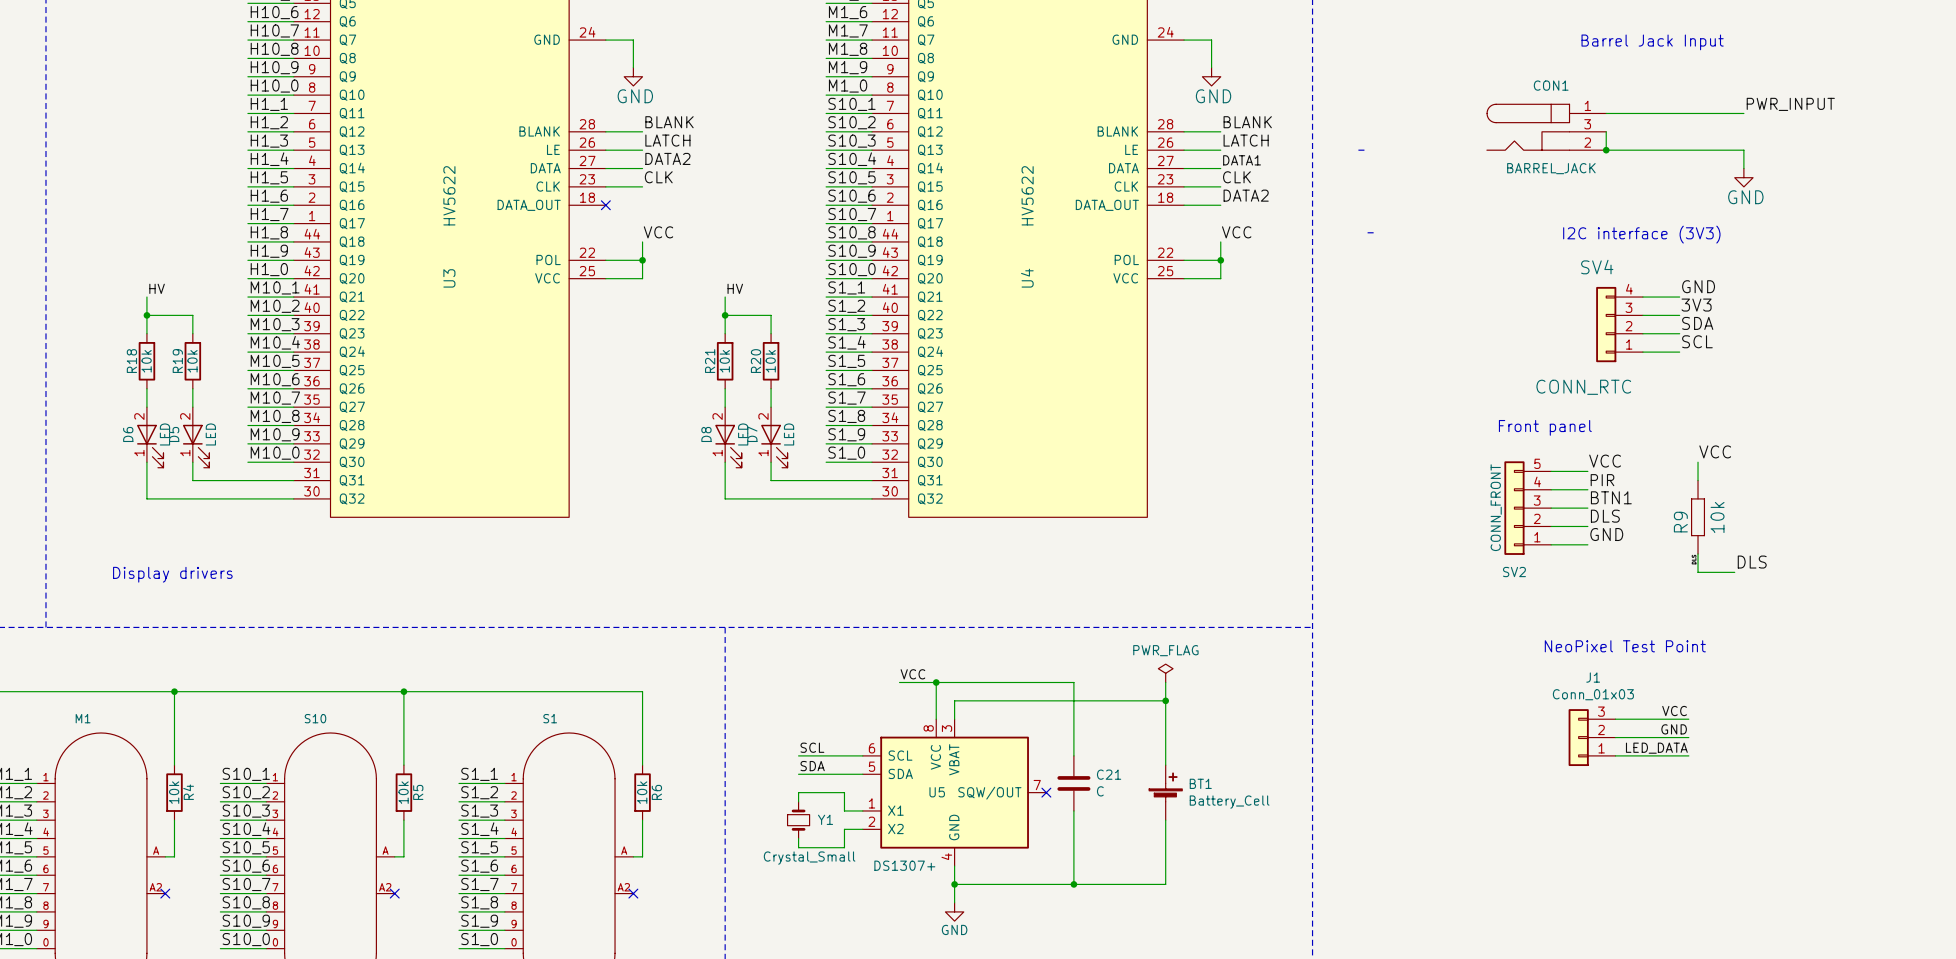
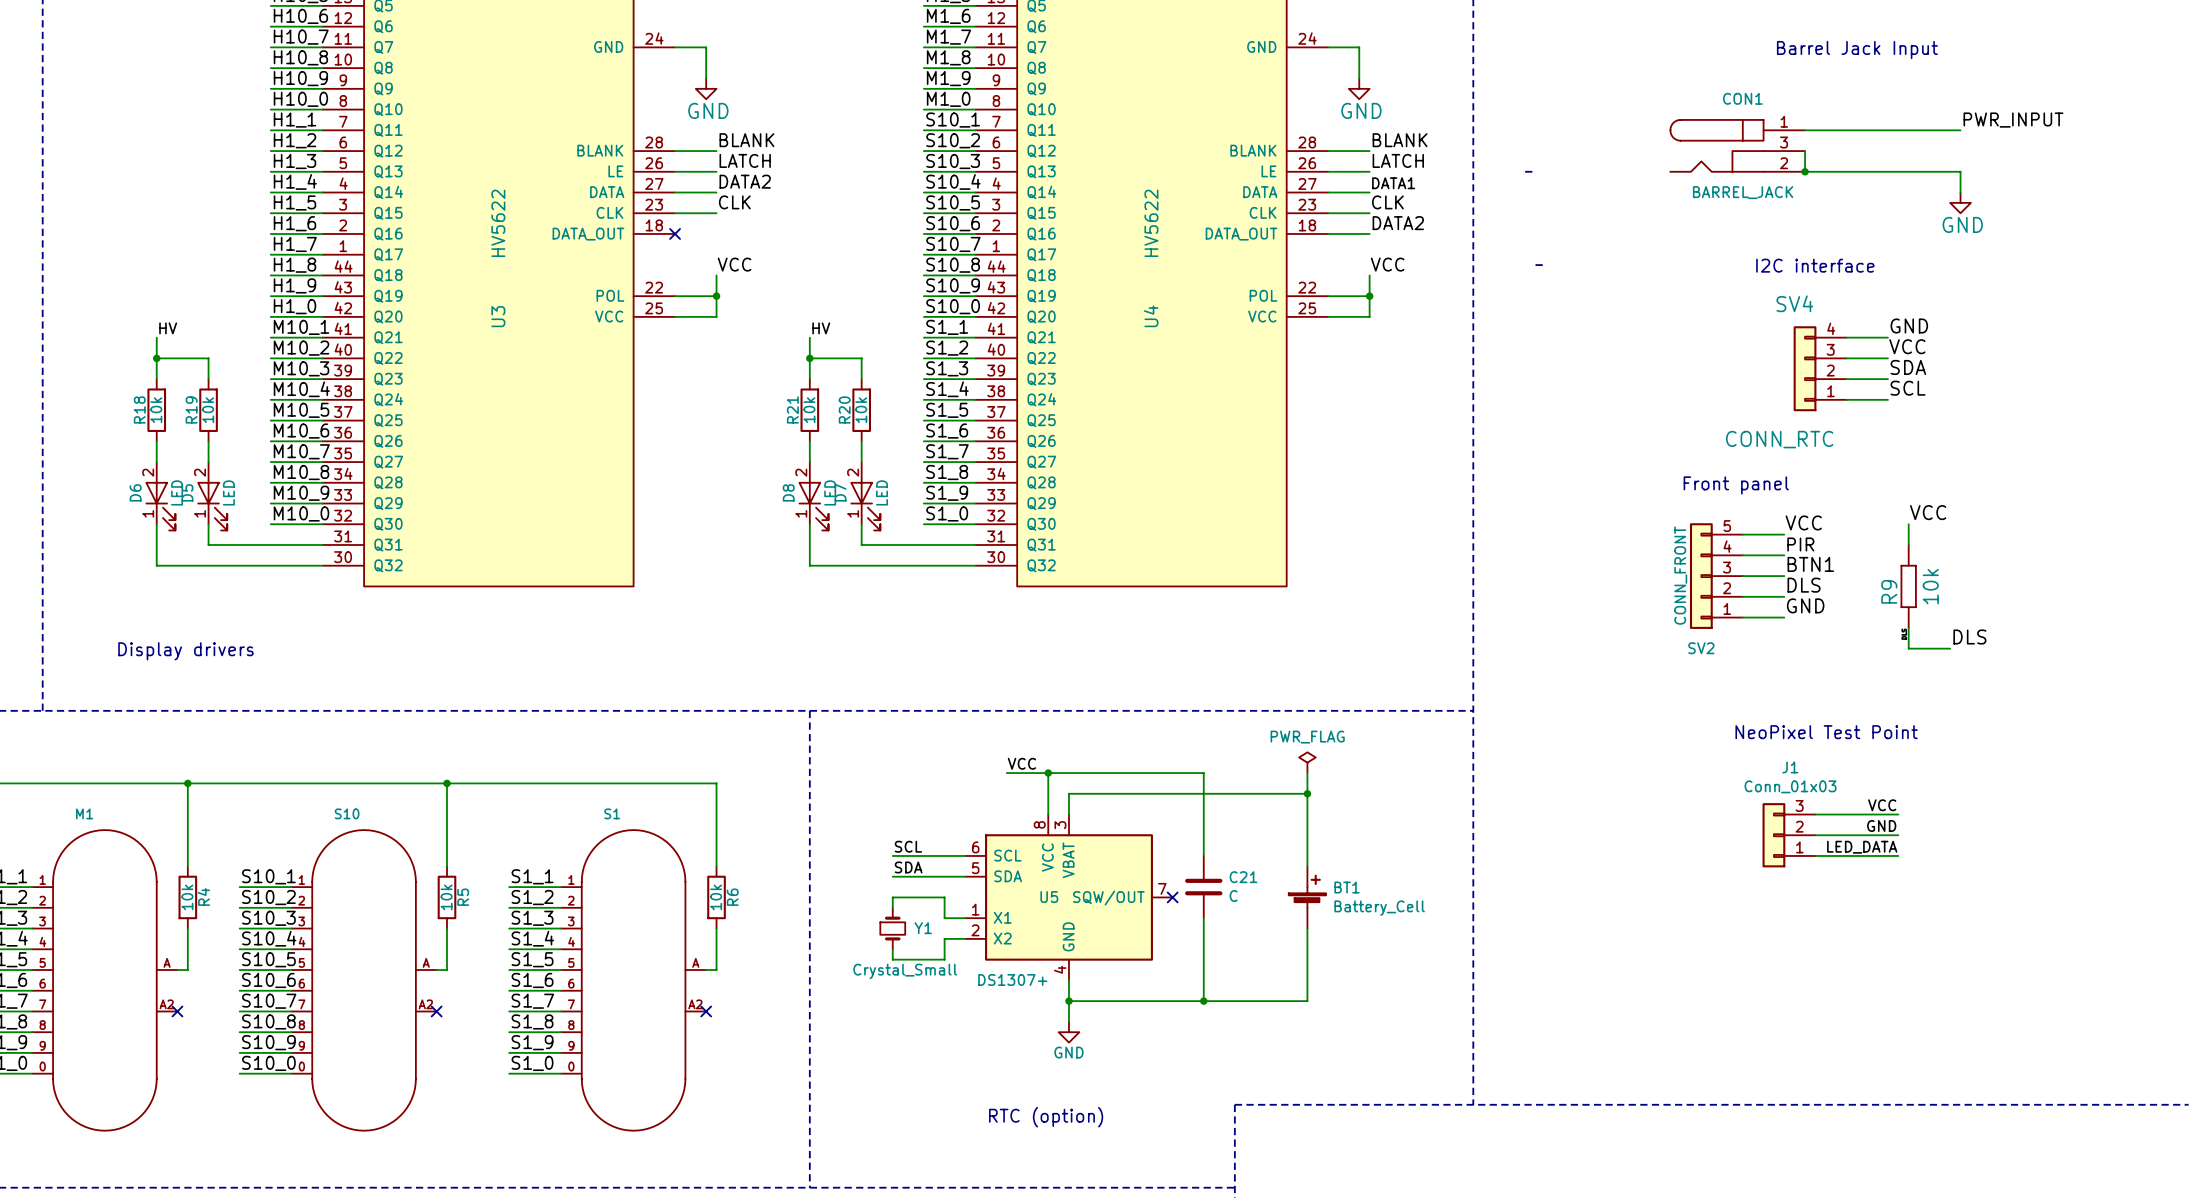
text: I2C interface (3V3) (1641, 234) -> I2C interface (1815, 265)
label: 3V3 (1696, 305) -> VCC (1907, 346)

